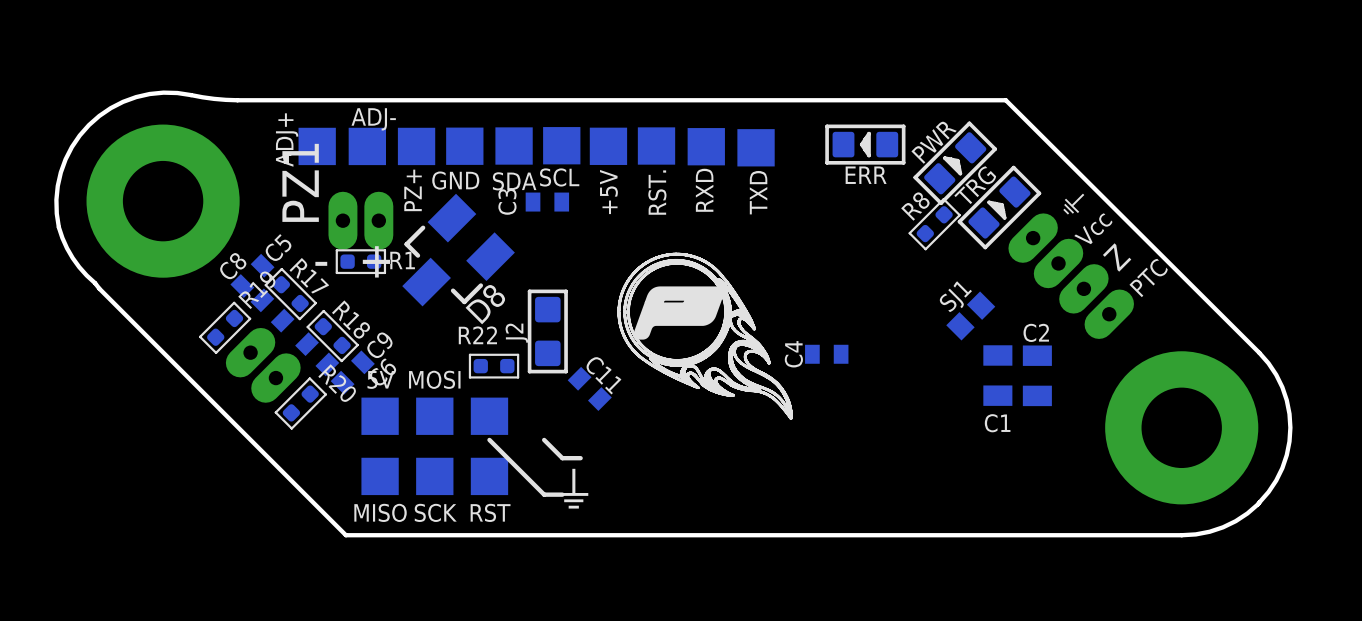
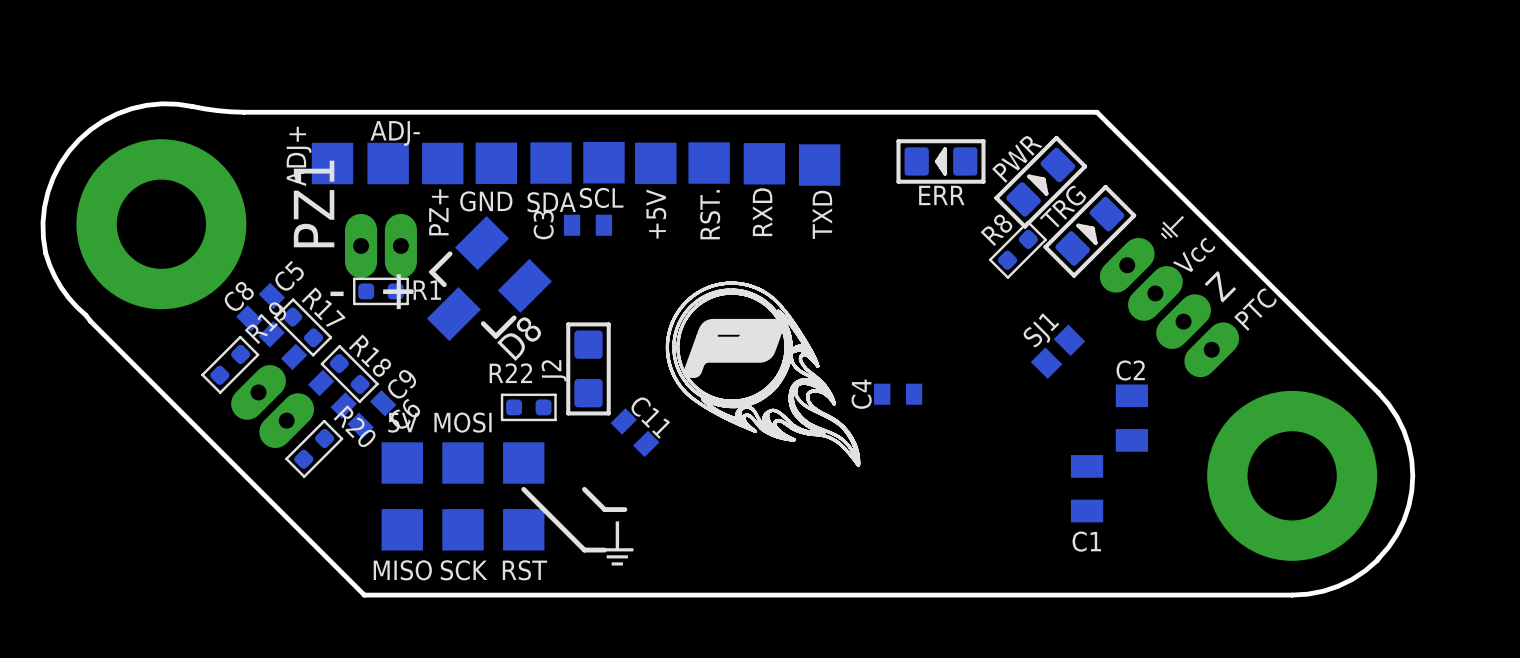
C1 position: (997, 375) -> (1087, 488)

